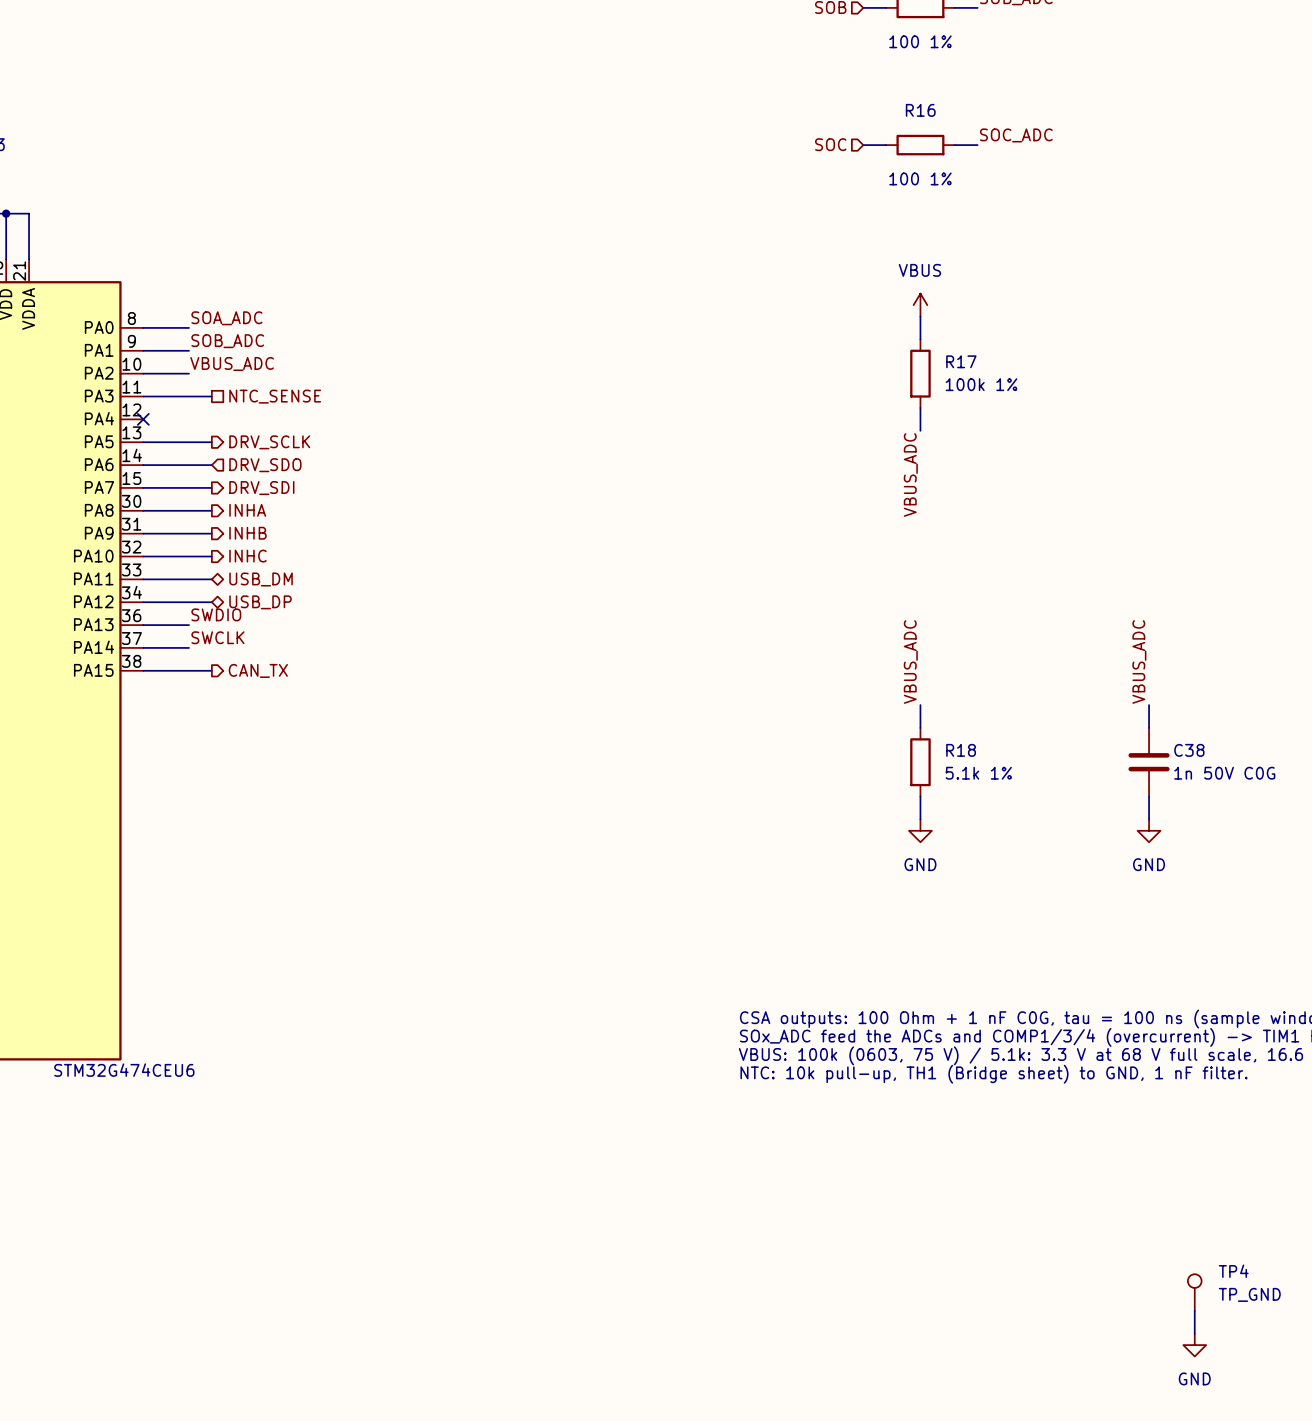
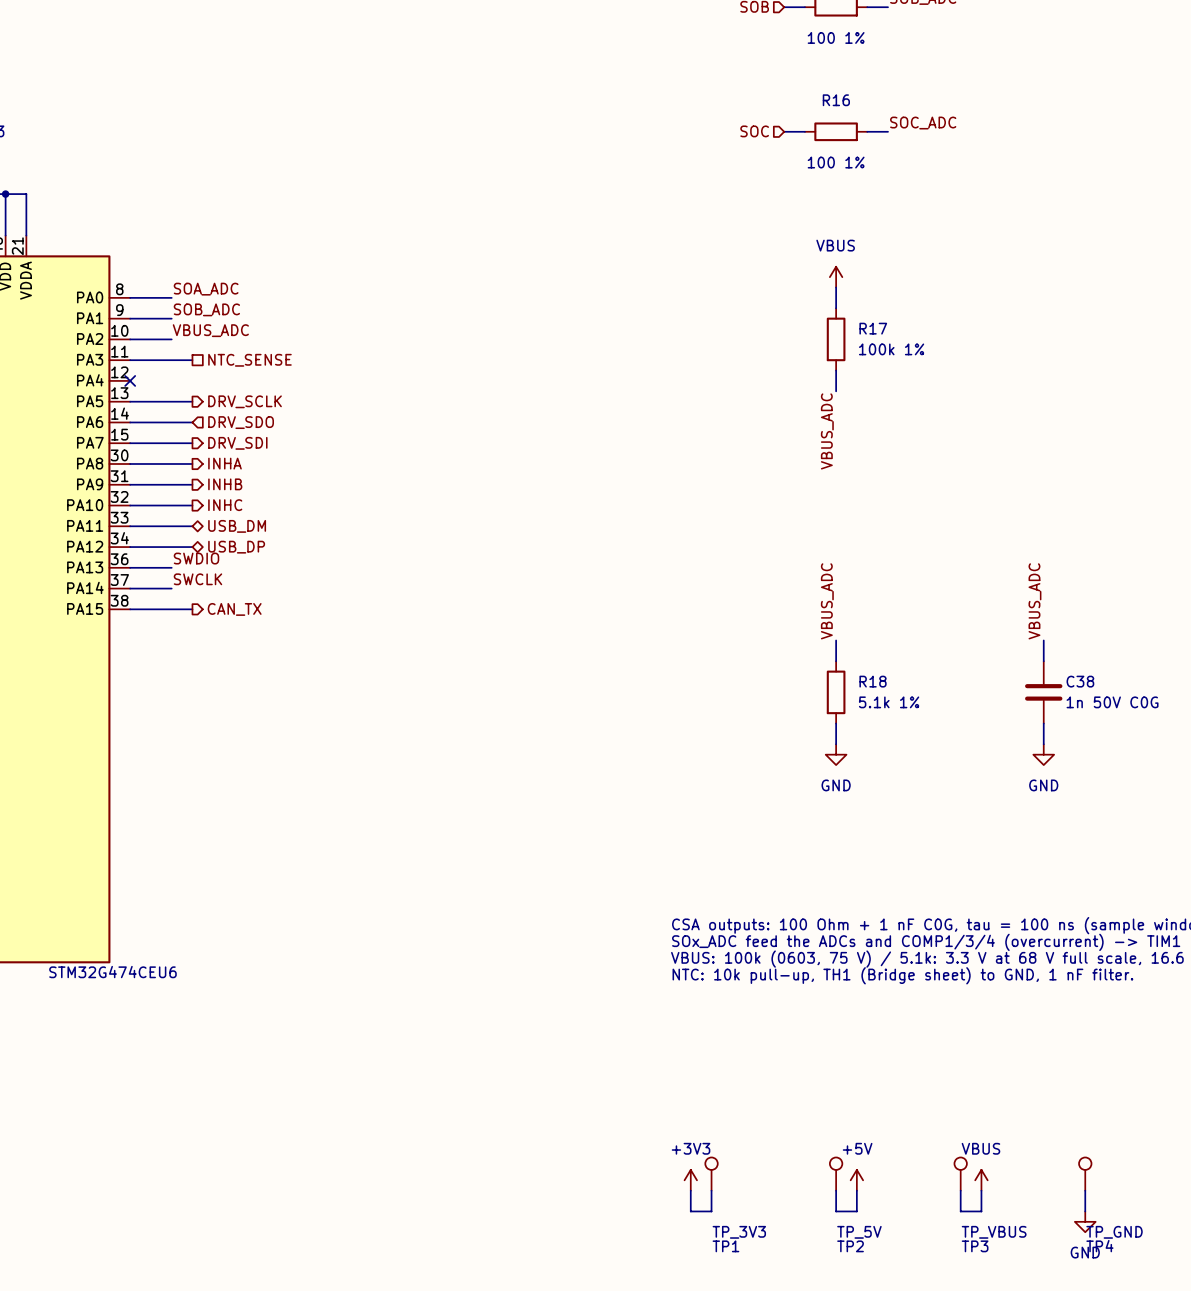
TP4 name position: TP4 (1233, 1271) -> TP4 (1099, 1246)
TP1: none -> TP_3V3 (711, 1174)
TP2: none -> TP_5V (836, 1174)
TP3: none -> TP_VBUS (960, 1174)
TP4 value position: TP_GND (1249, 1294) -> TP_GND (1114, 1232)
power symbol: none -> +3V3 (690, 1180)
power symbol: none -> +5V (856, 1180)
power symbol: none -> VBUS (981, 1180)
wire: none -> (690, 1190) (690, 1211) (711, 1211) (711, 1190)
wire: none -> (836, 1190) (836, 1211) (856, 1211) (856, 1190)
wire: none -> (960, 1190) (960, 1211) (981, 1211) (981, 1190)

